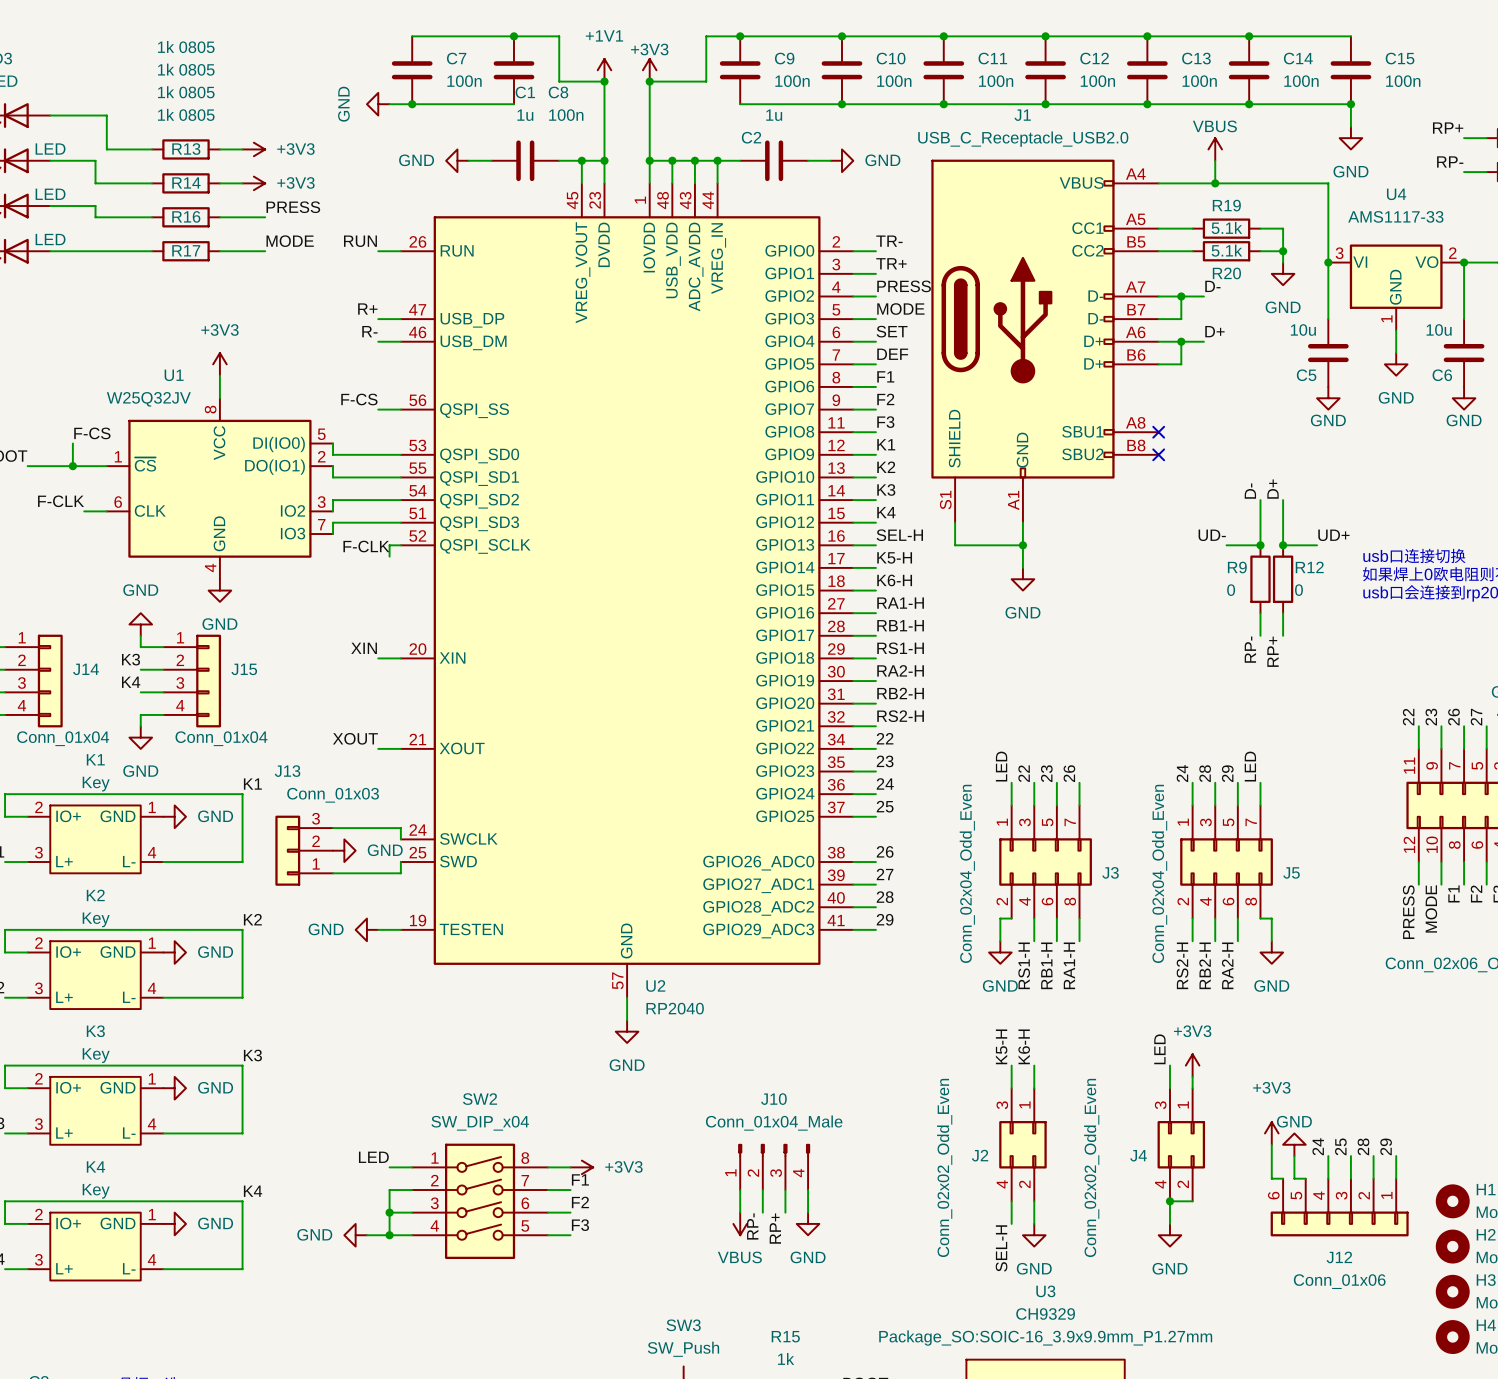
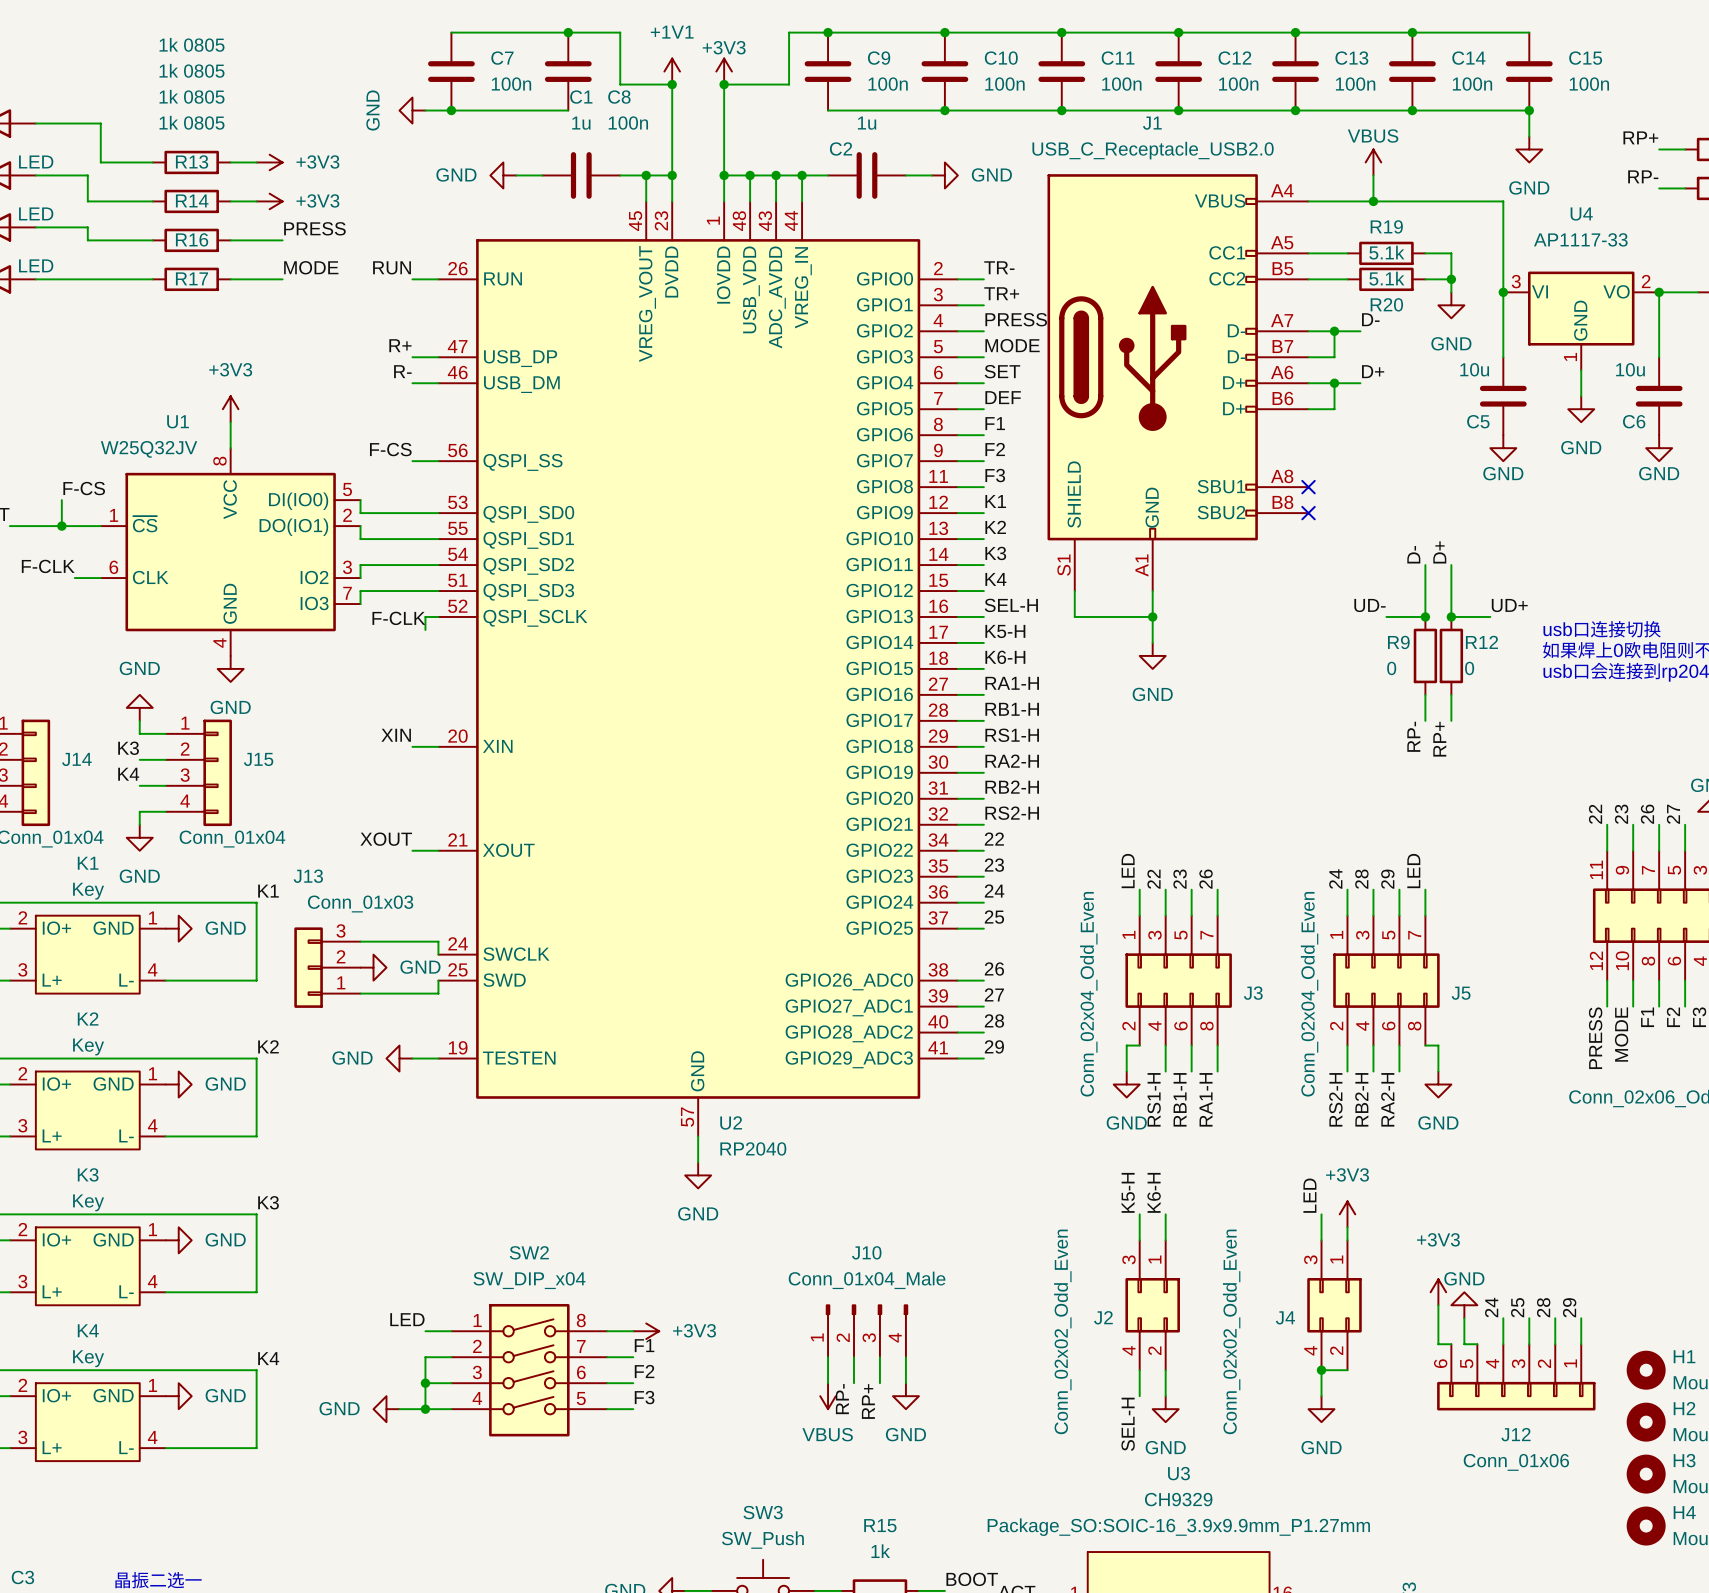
U4 value: AMS1117-33 (1395, 216) -> AP1117-33 (1580, 239)

